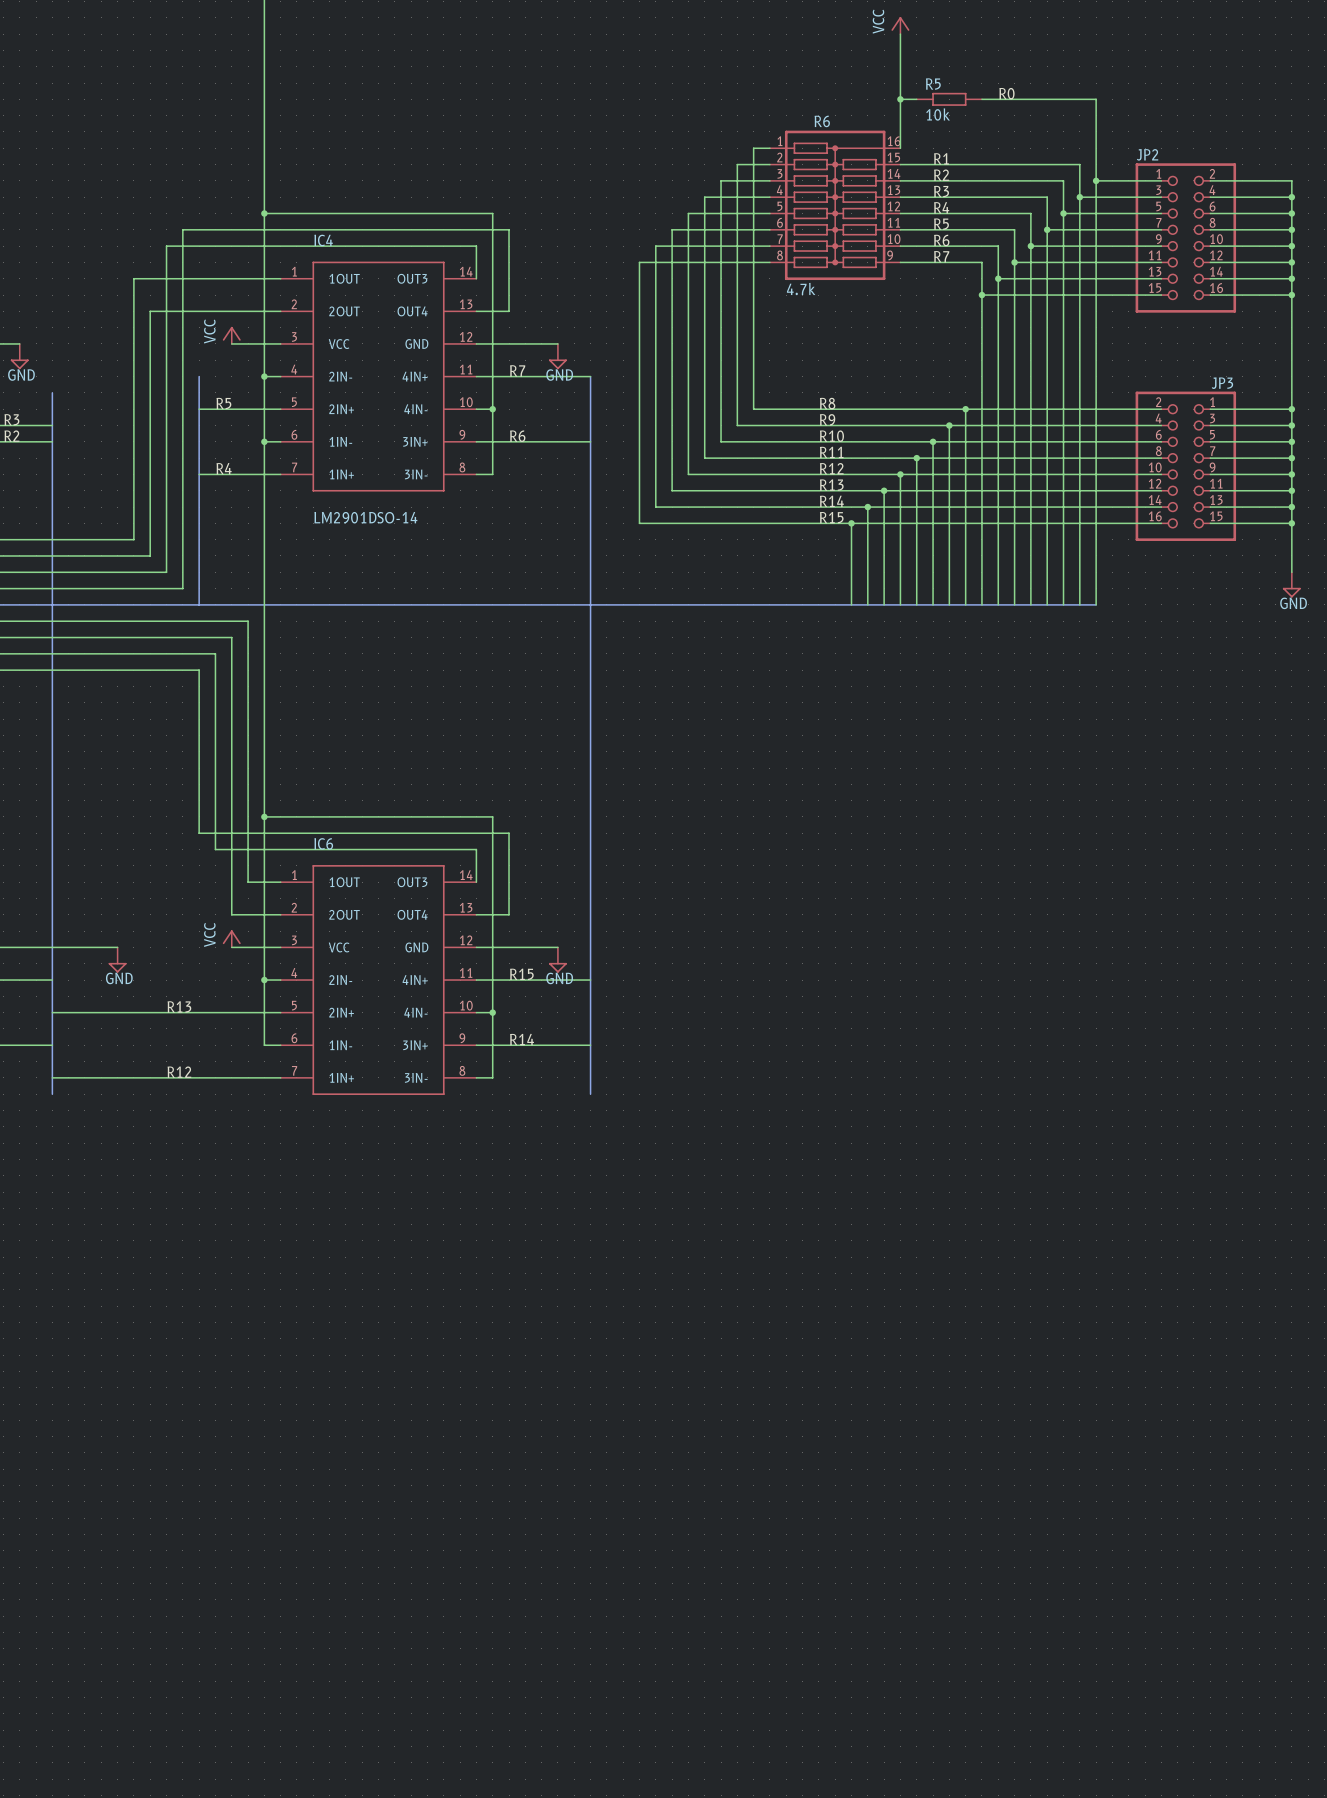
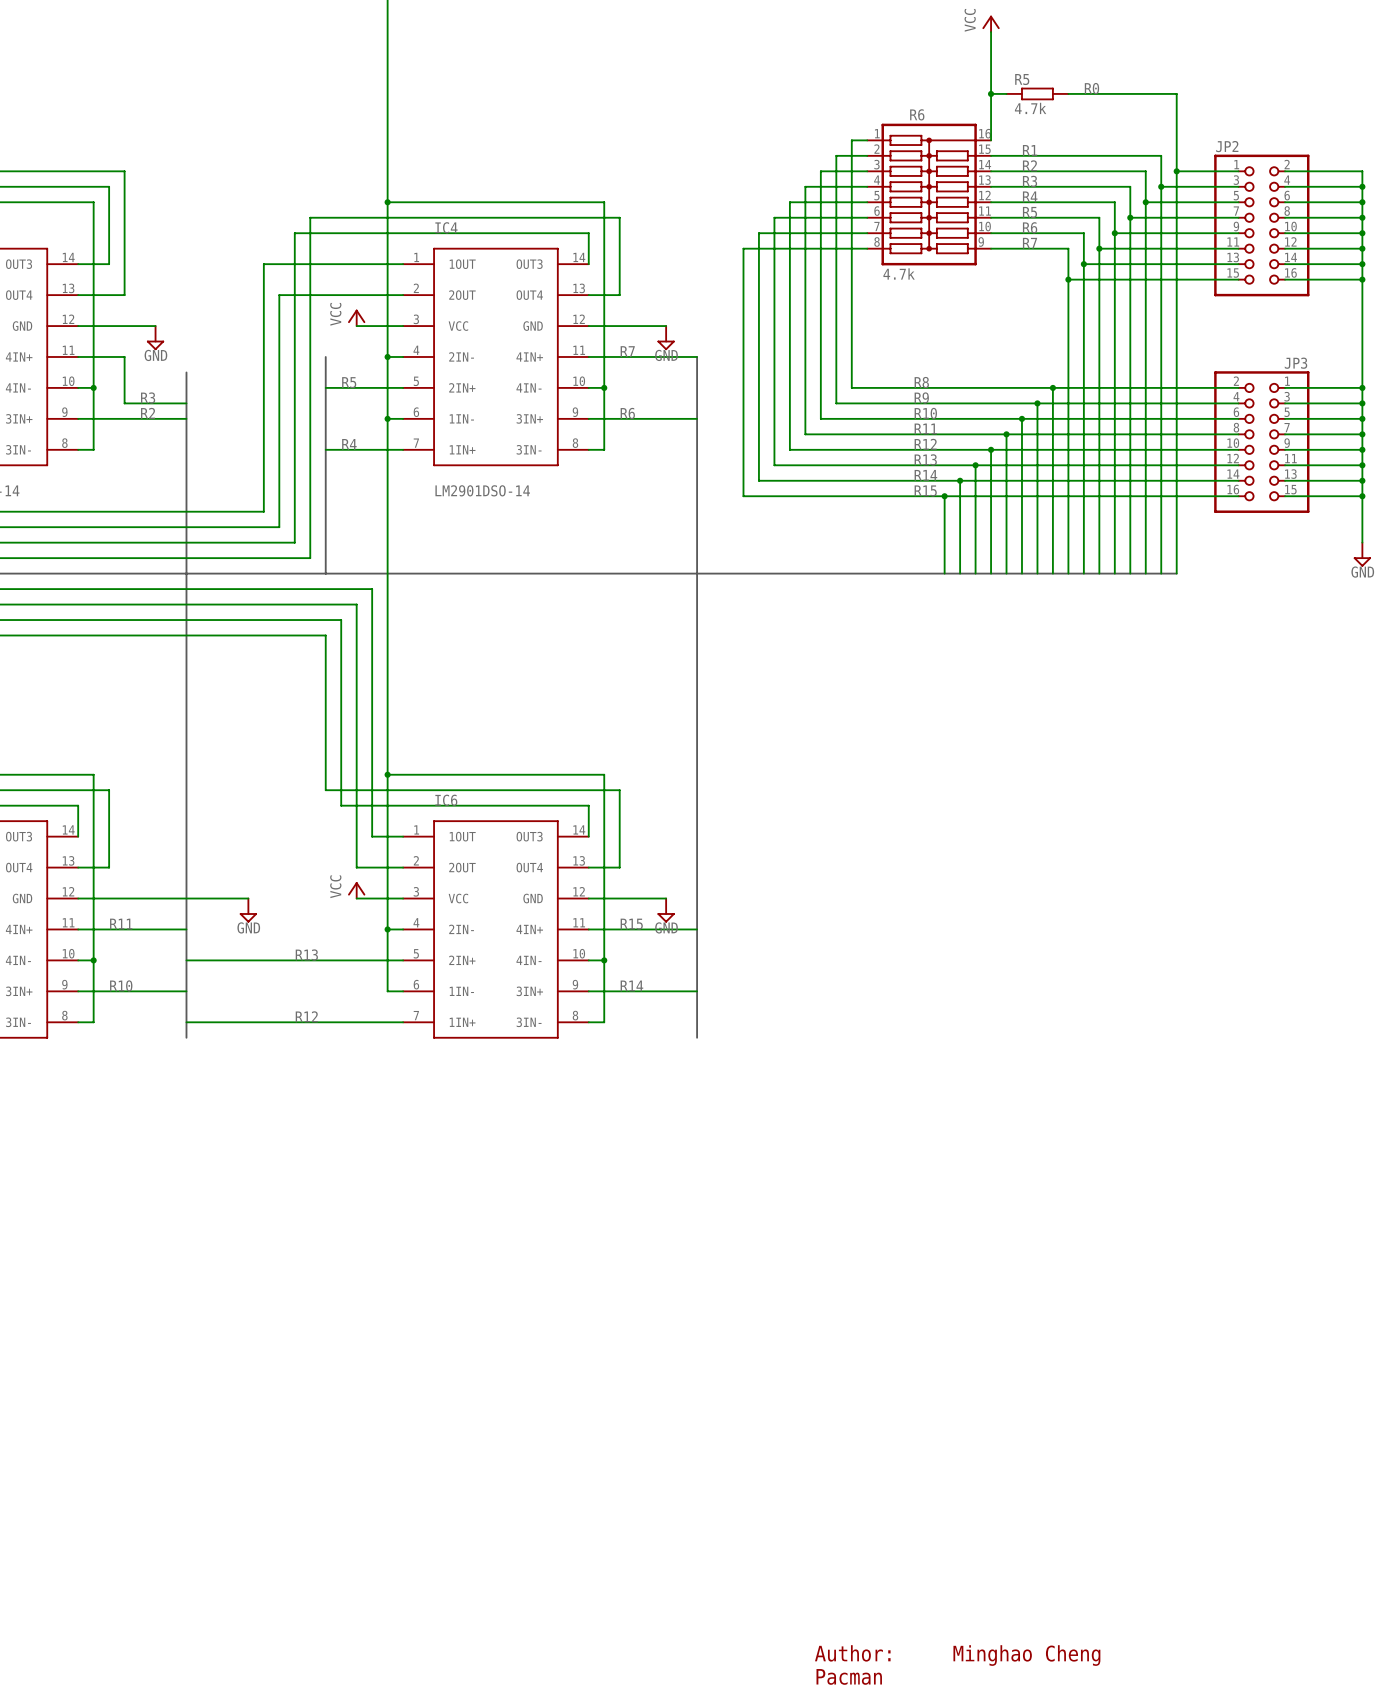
R5 value: 10k (938, 114) -> 4.7k (1030, 108)
text: none -> Author: Minghao Cheng (957, 1655)
text: none -> Pacman (849, 1676)

